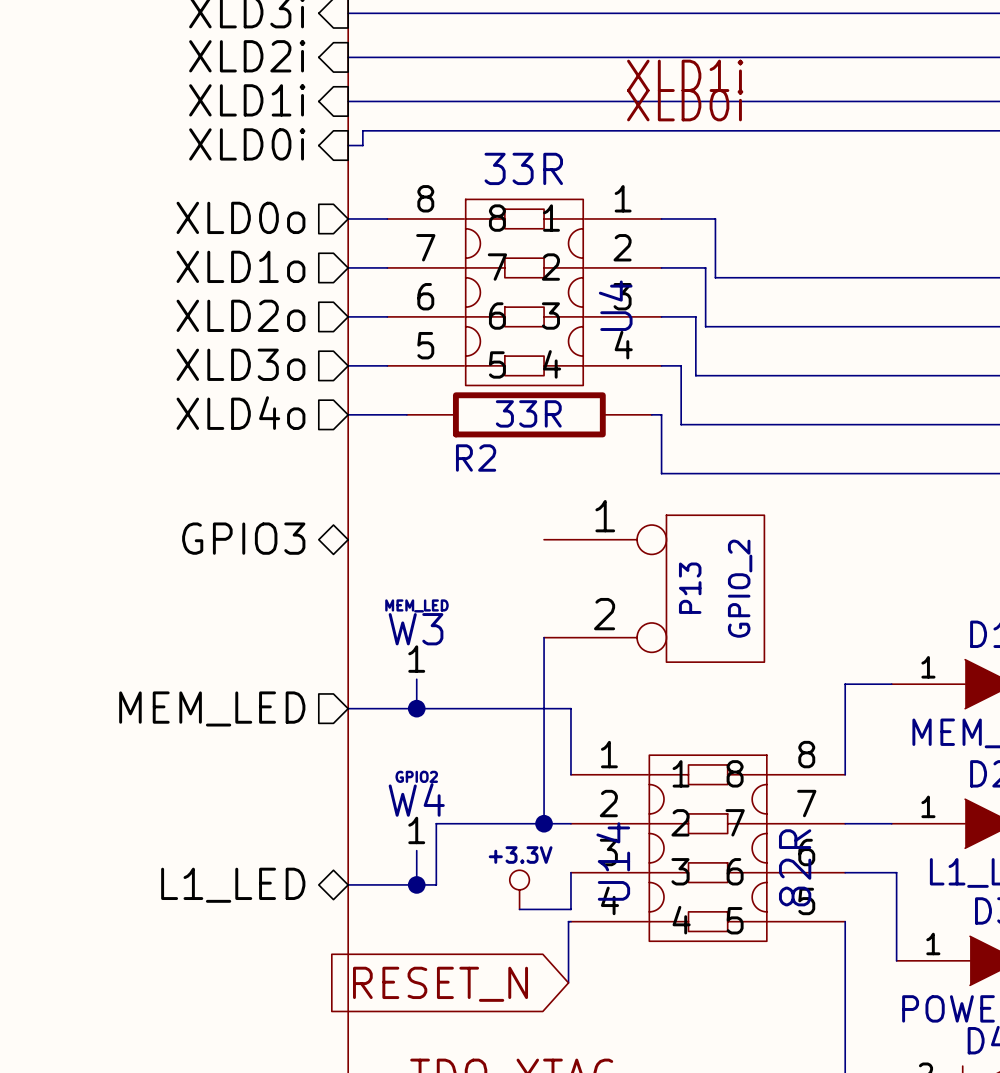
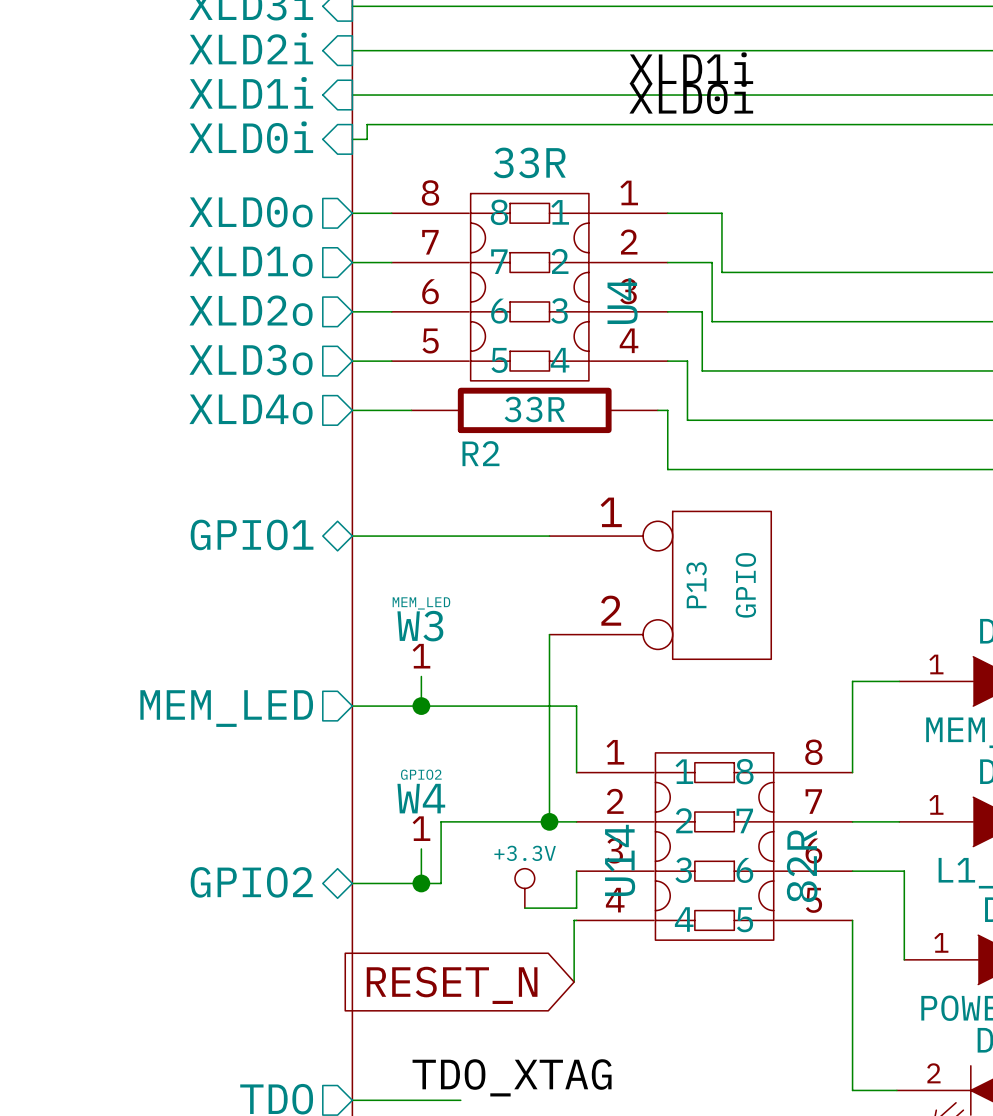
sheet pin: GPIO3 (243, 538) -> GPIO1 (252, 534)
wire: none -> (352, 536) (549, 536)
P13 value: GPIO_2 (740, 588) -> GPIO (745, 585)
sheet pin: L1_LED (233, 885) -> GPIO2 (251, 882)

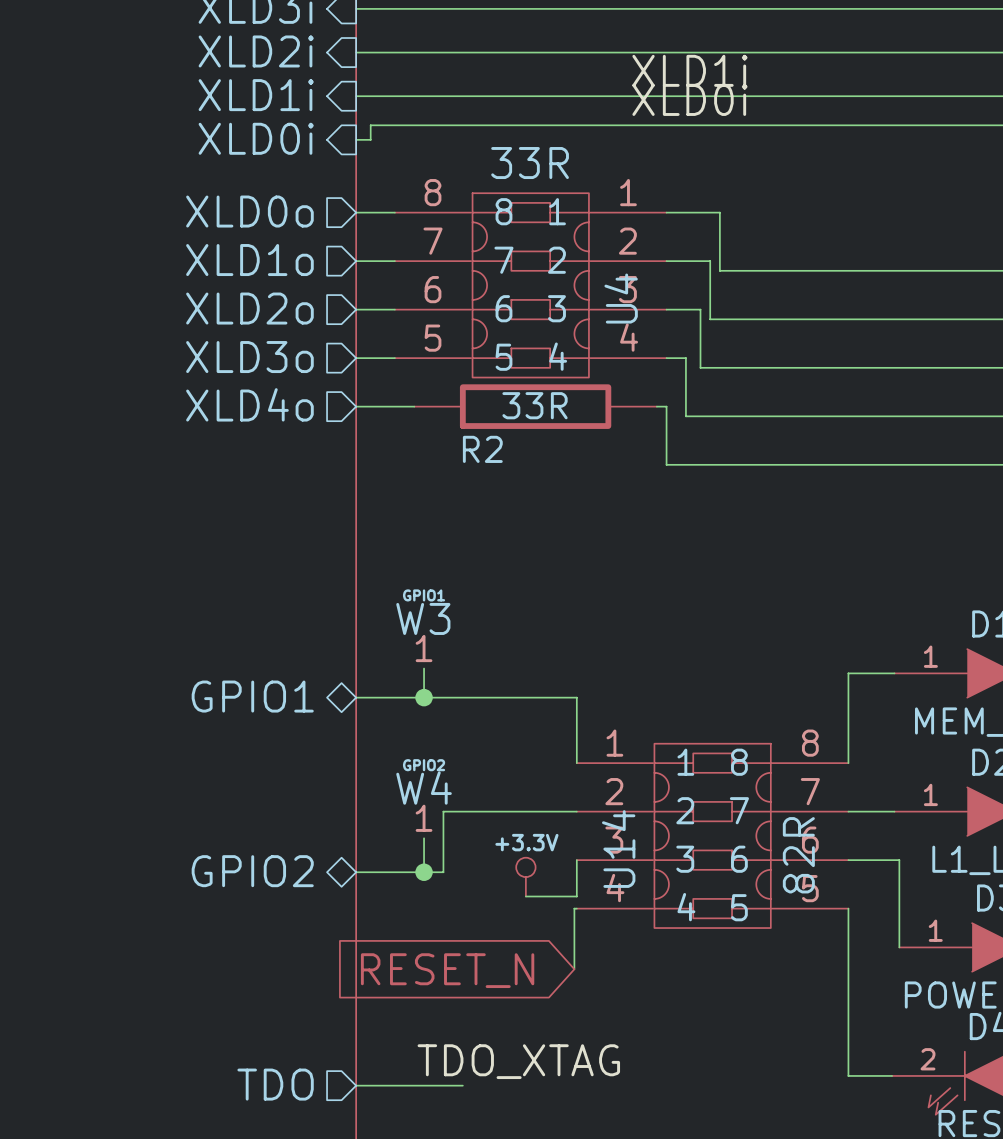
sheet pin: GPIO1 (252, 534) -> none
wire: (352, 536) (549, 536) -> none
P13: GPIO (660, 585) -> none
W3 value: MEM_LED (421, 603) -> GPIO1 (424, 595)
wire: (549, 634) (549, 821) -> none
sheet pin shape: output (226, 708) -> bidirectional (252, 696)
sheet pin: MEM_LED (226, 708) -> GPIO1 (252, 696)
junction: (549, 821) -> none

